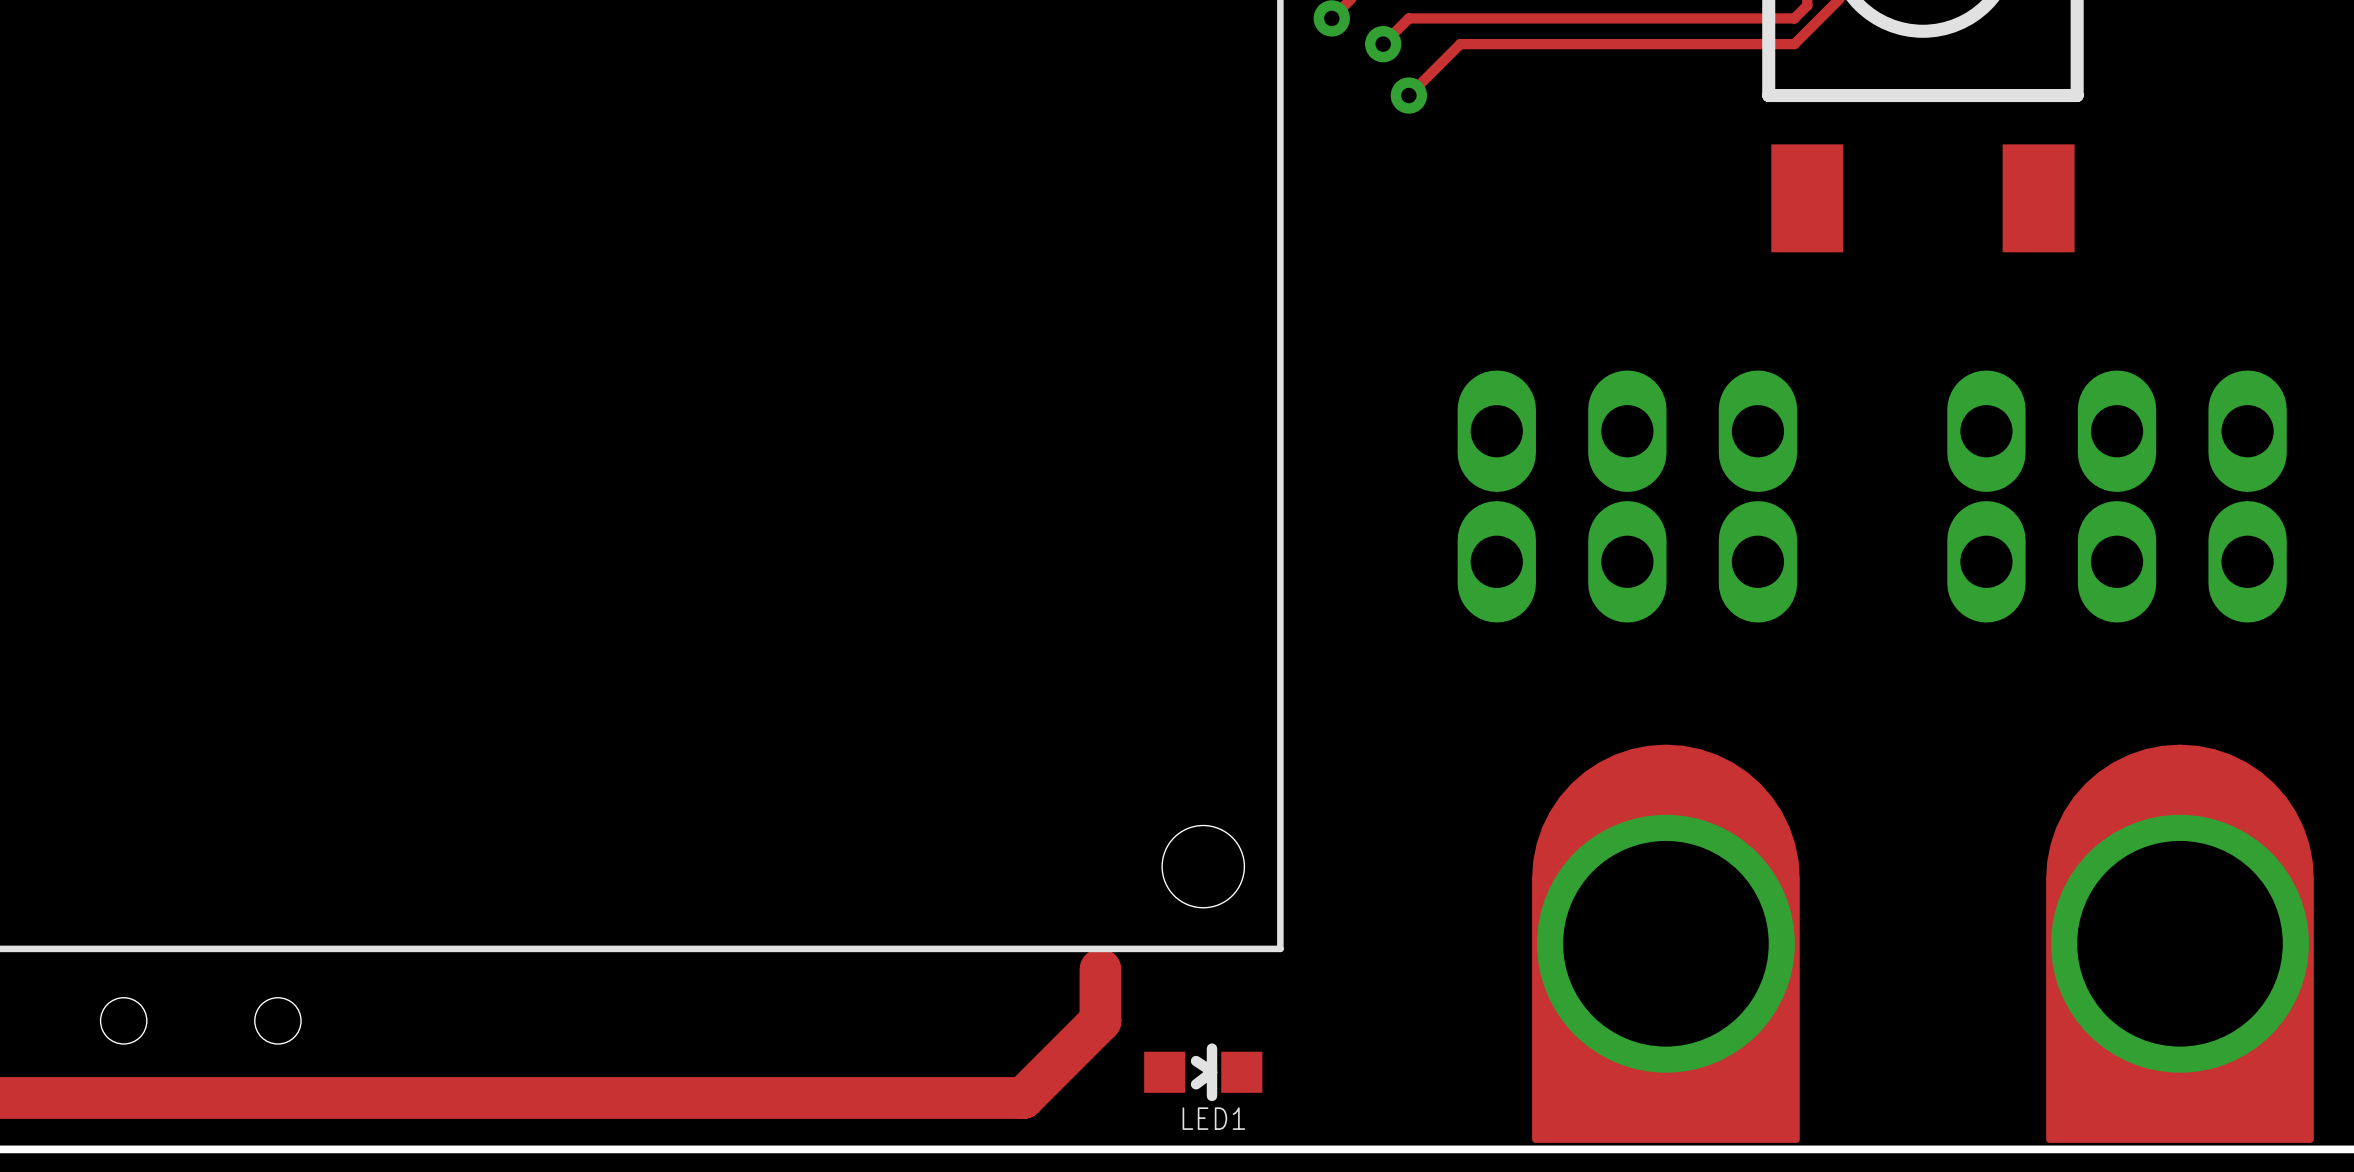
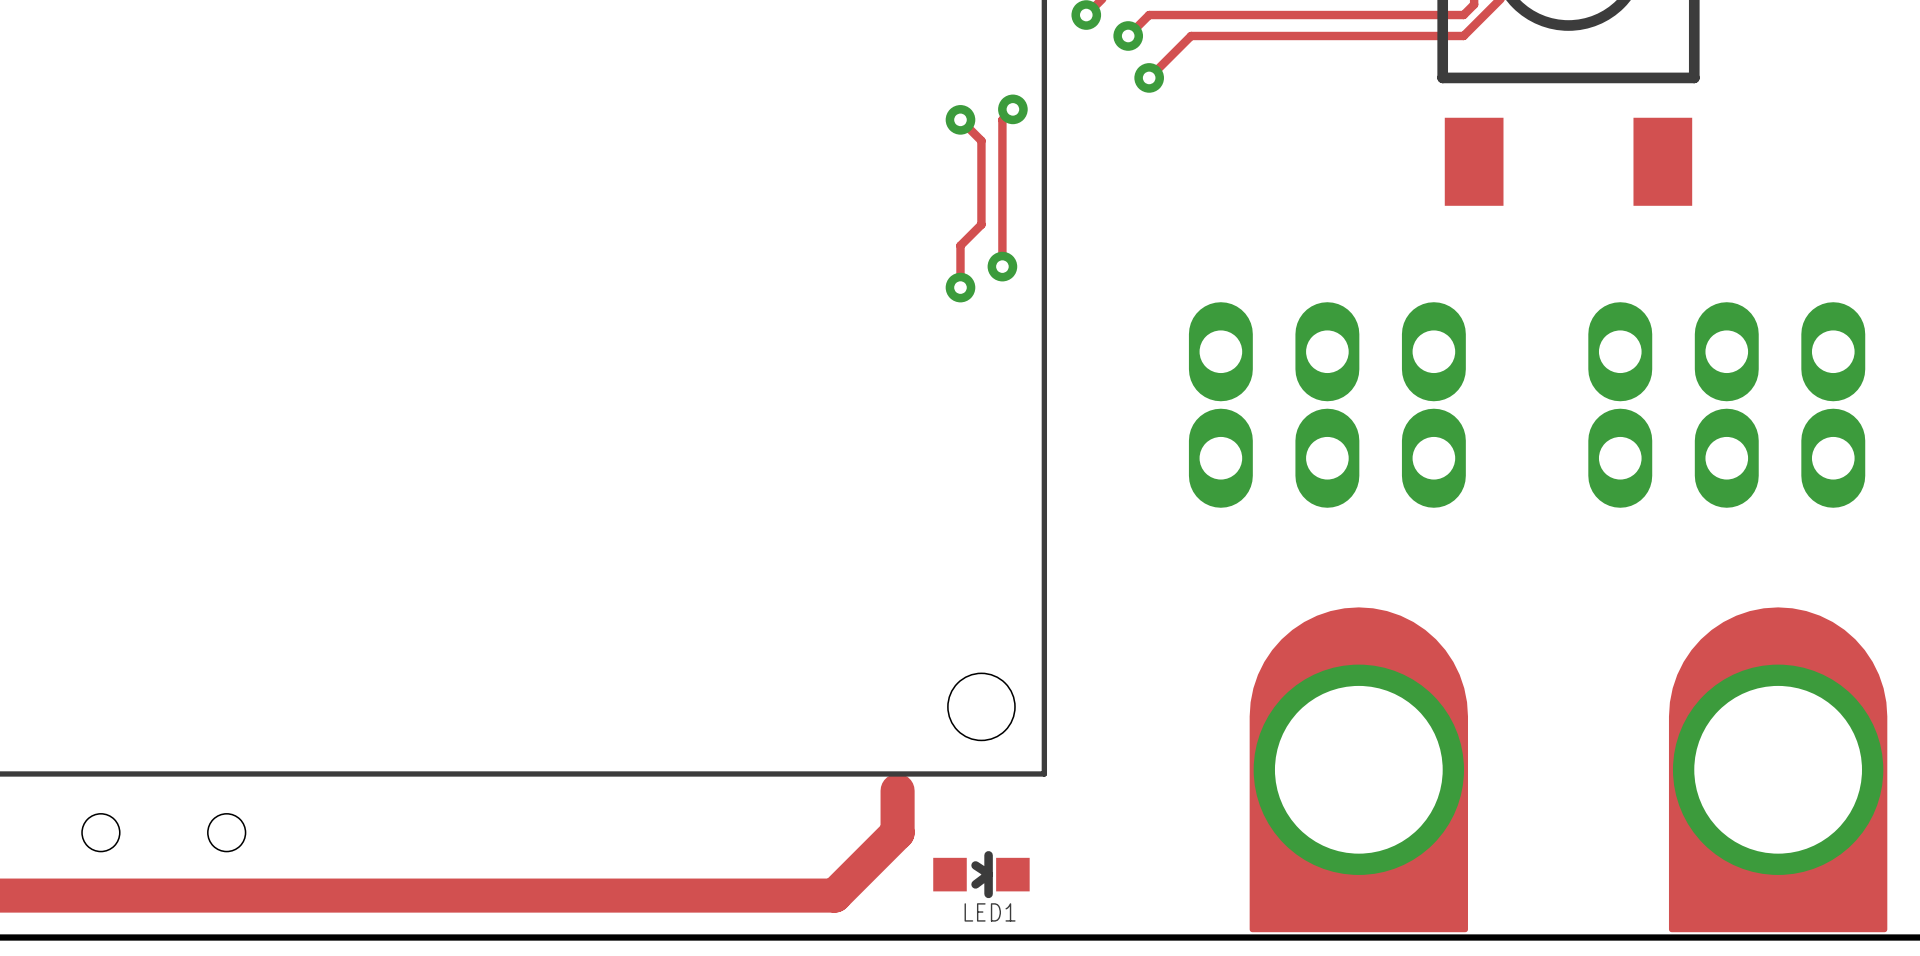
track: none -> (1012, 109) (1002, 119) (1002, 266)
via: none -> (1012, 109)
track: none -> (960, 119) (981, 140) (981, 224) (960, 245) (960, 287)
via: none -> (960, 119)
via: none -> (1002, 266)
via: none -> (960, 287)

